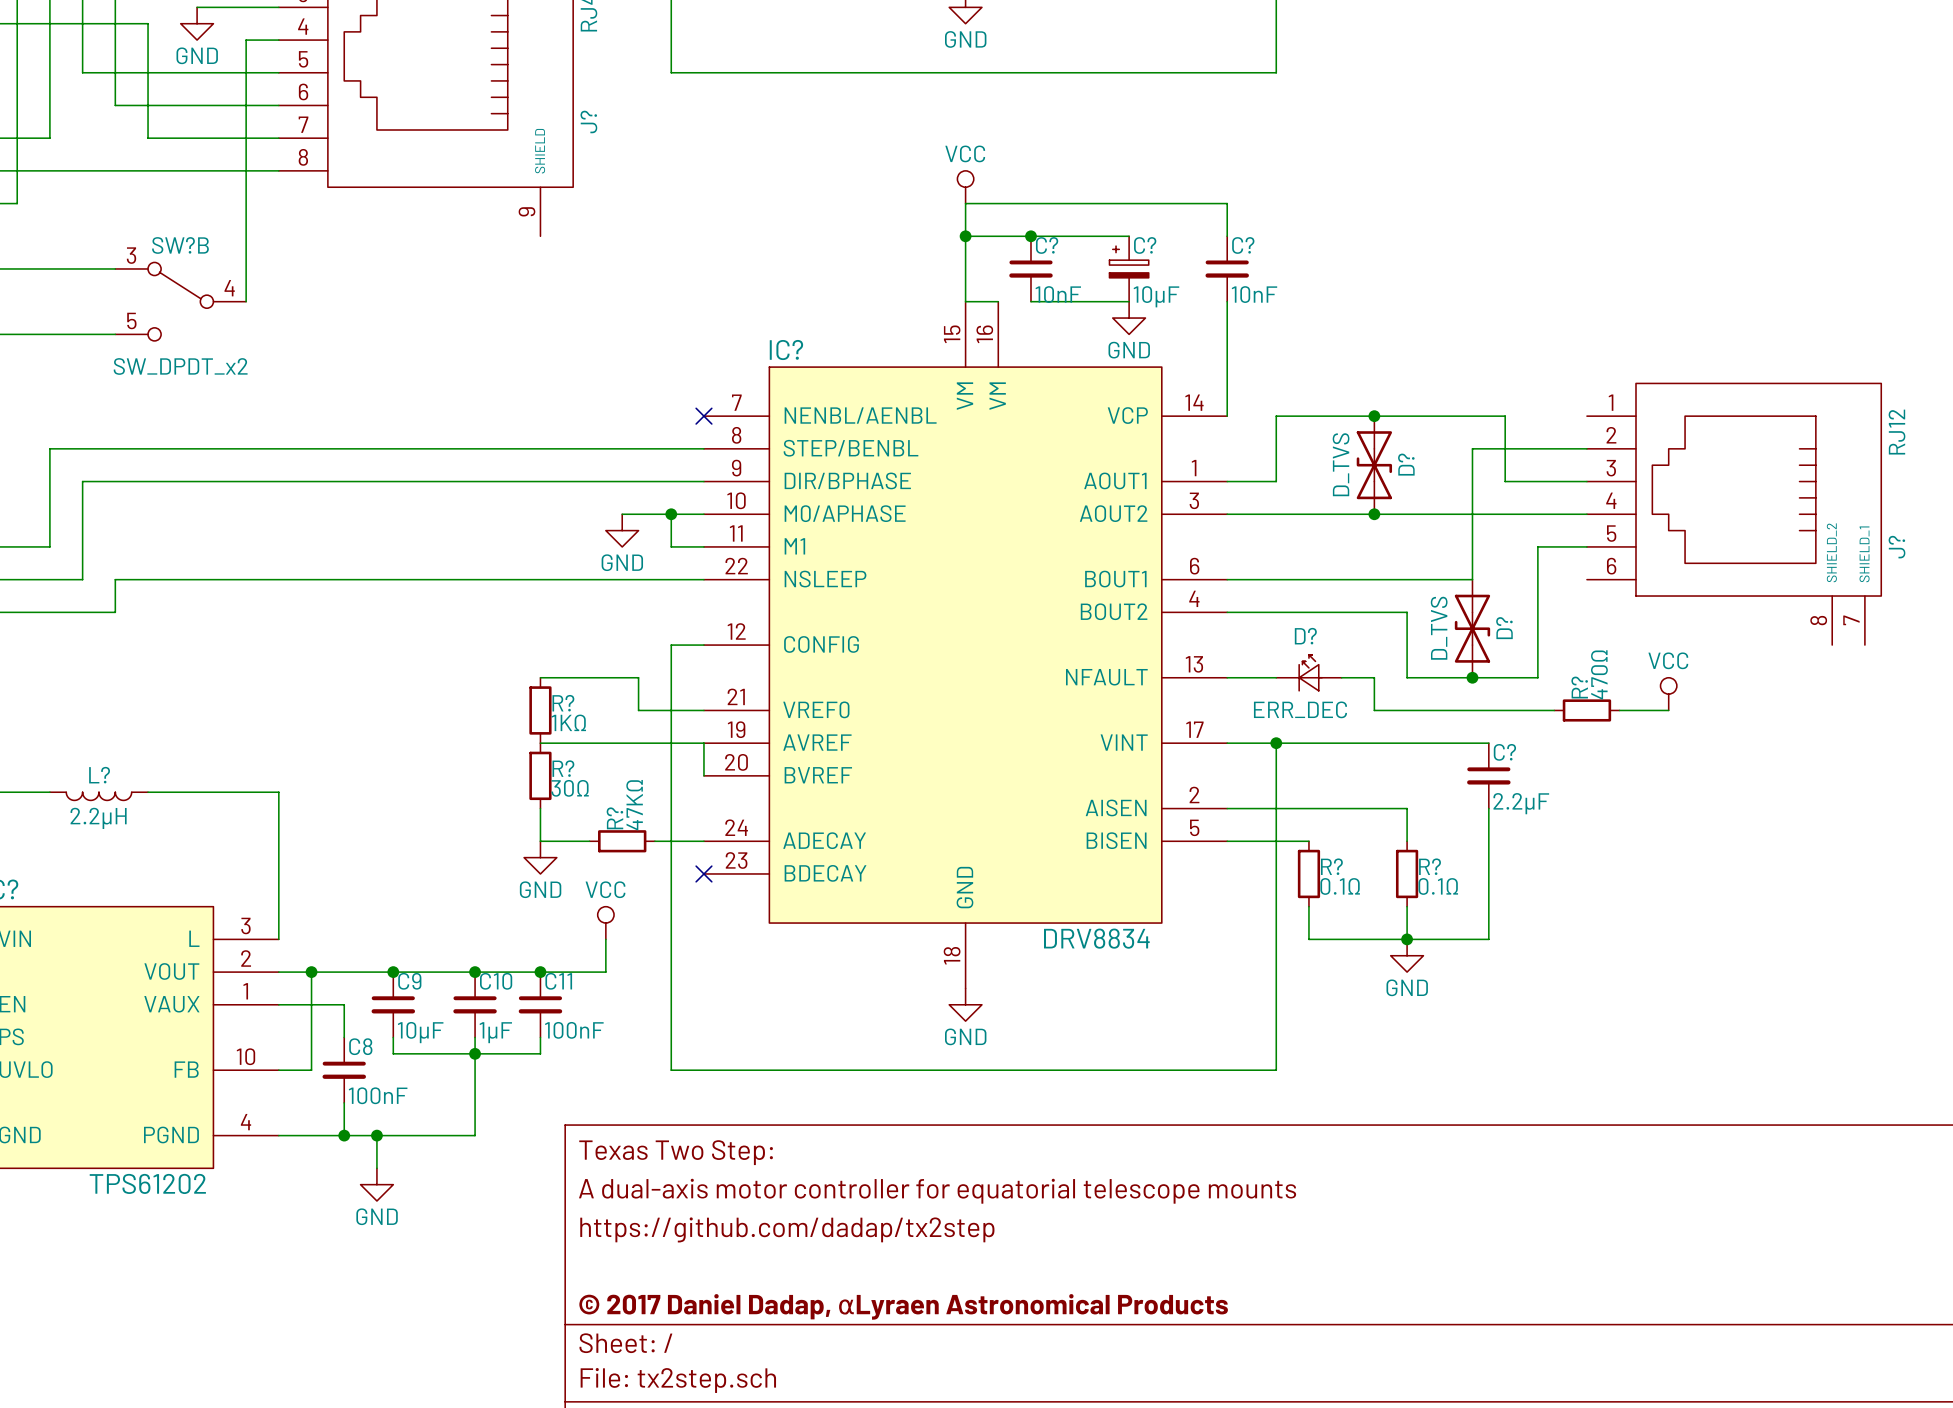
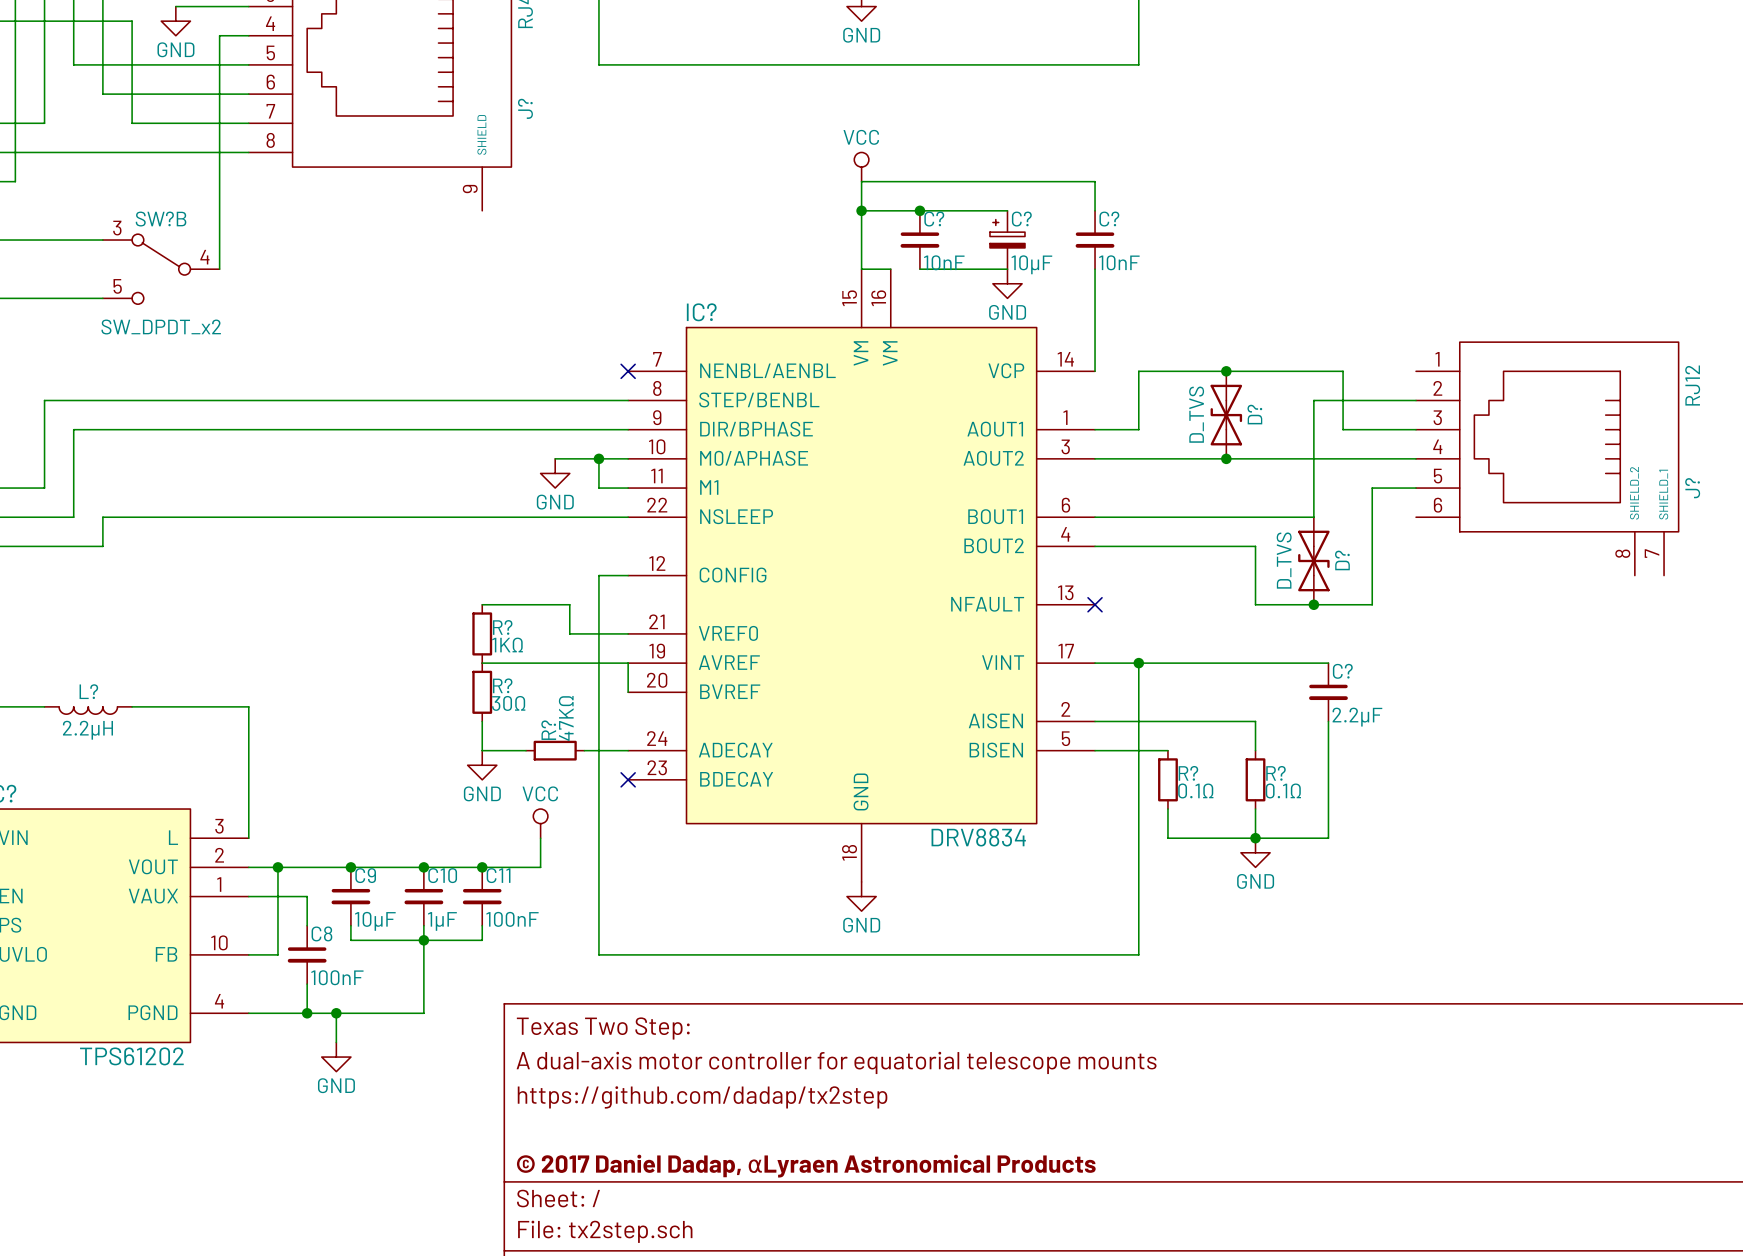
D?: ERR_DEC (1308, 672) -> none
wire: (1227, 677) (1276, 677) -> none
no-connect mark: none -> (1095, 604)
wire: (1341, 677) (1374, 677) (1374, 710) (1554, 710) -> none
power symbol: VCC (1668, 694) -> none
R?: 470Ω (1586, 710) -> none
wire: (1619, 710) (1668, 710) -> none

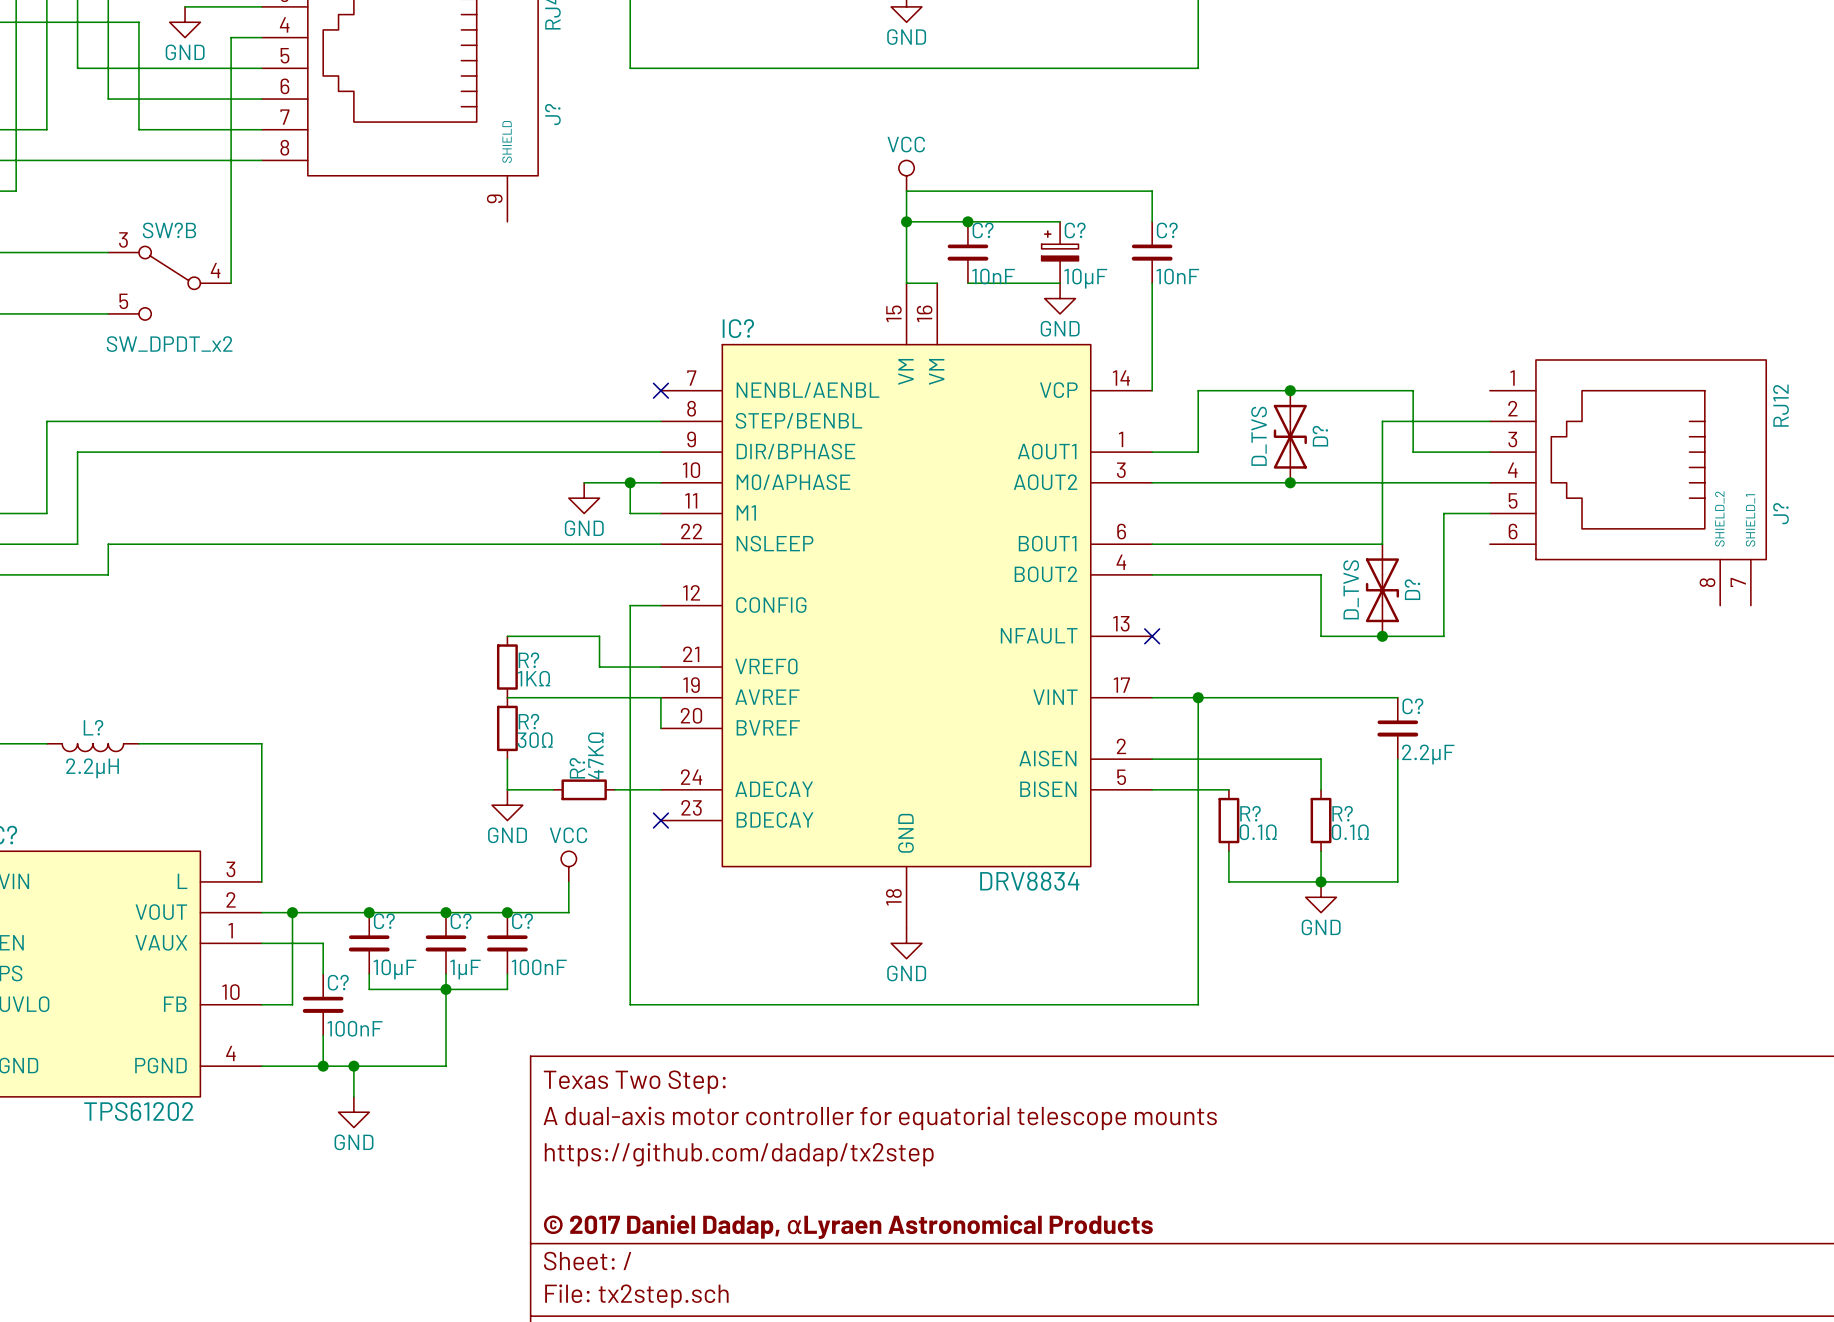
C9 name: C9 (365, 875) -> C? (384, 921)
C10 name: C10 (442, 875) -> C? (461, 921)
C11 name: C11 (498, 875) -> C? (522, 921)
C8 name: C8 (321, 933) -> C? (338, 982)

